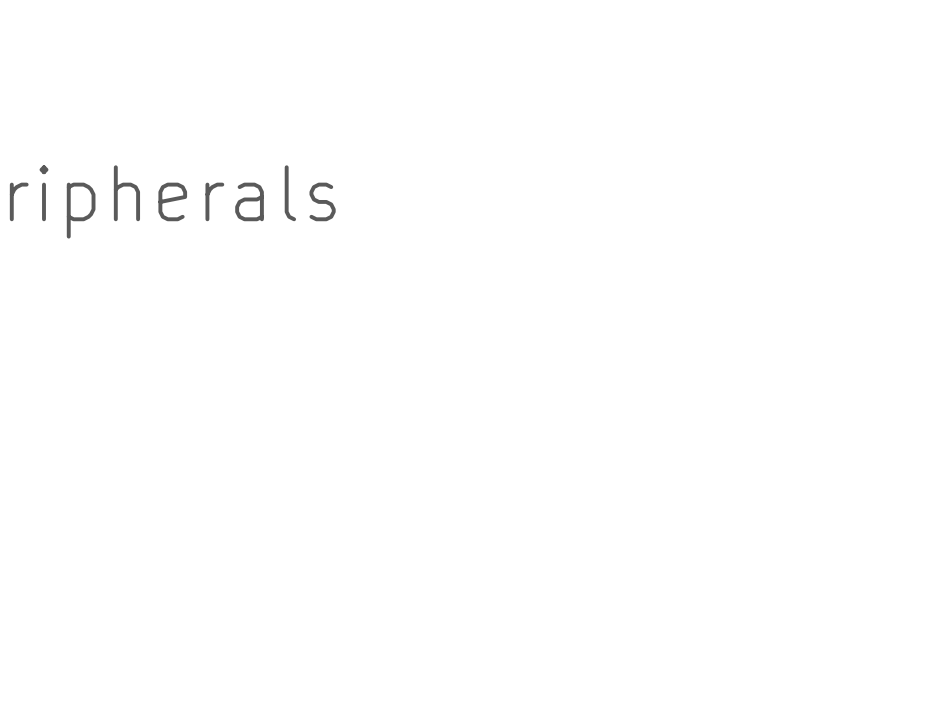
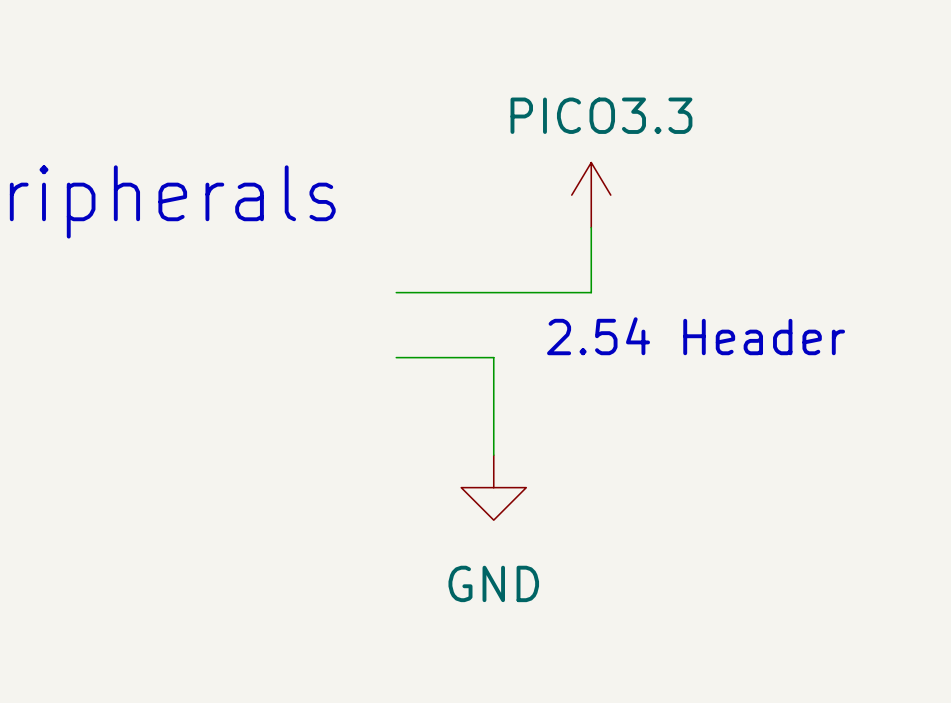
power symbol: none -> PICO3.3 (591, 195)
wire: none -> (591, 227) (591, 292) (396, 292)
text: none -> 2.54 Header (696, 336)
wire: none -> (396, 357) (493, 357) (493, 455)
power symbol: none -> GND (493, 487)

